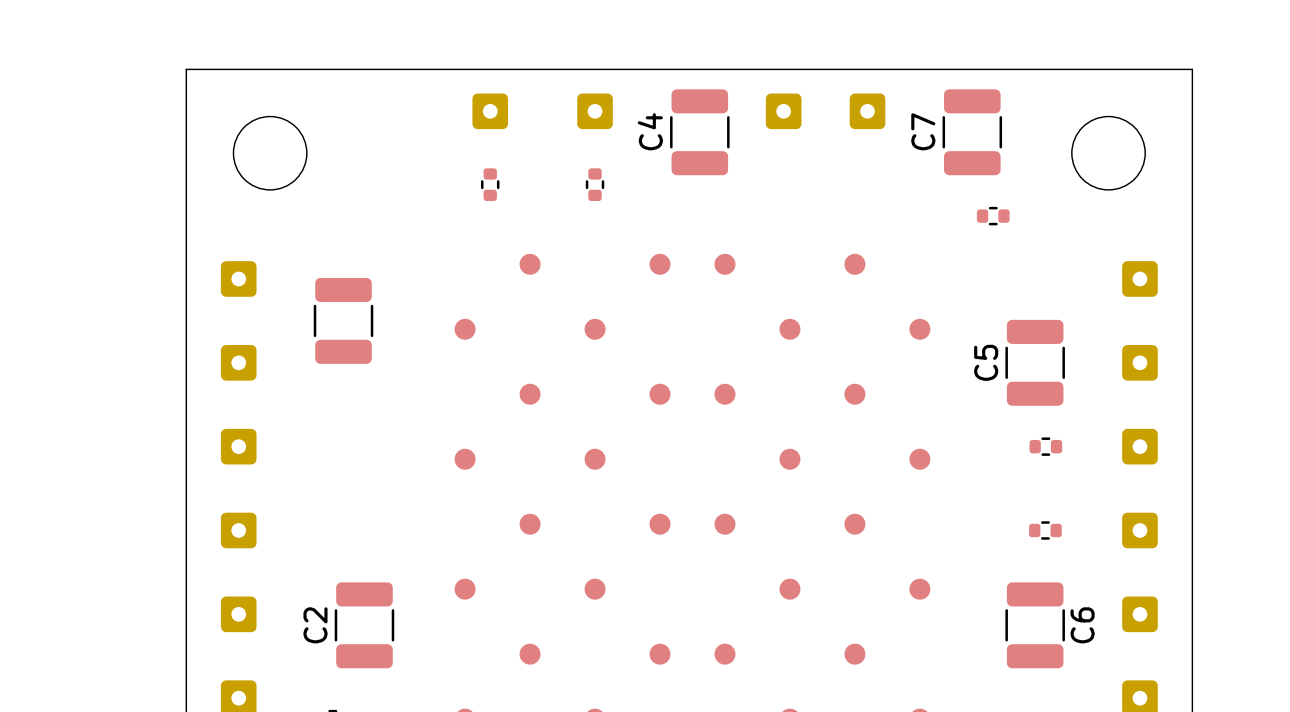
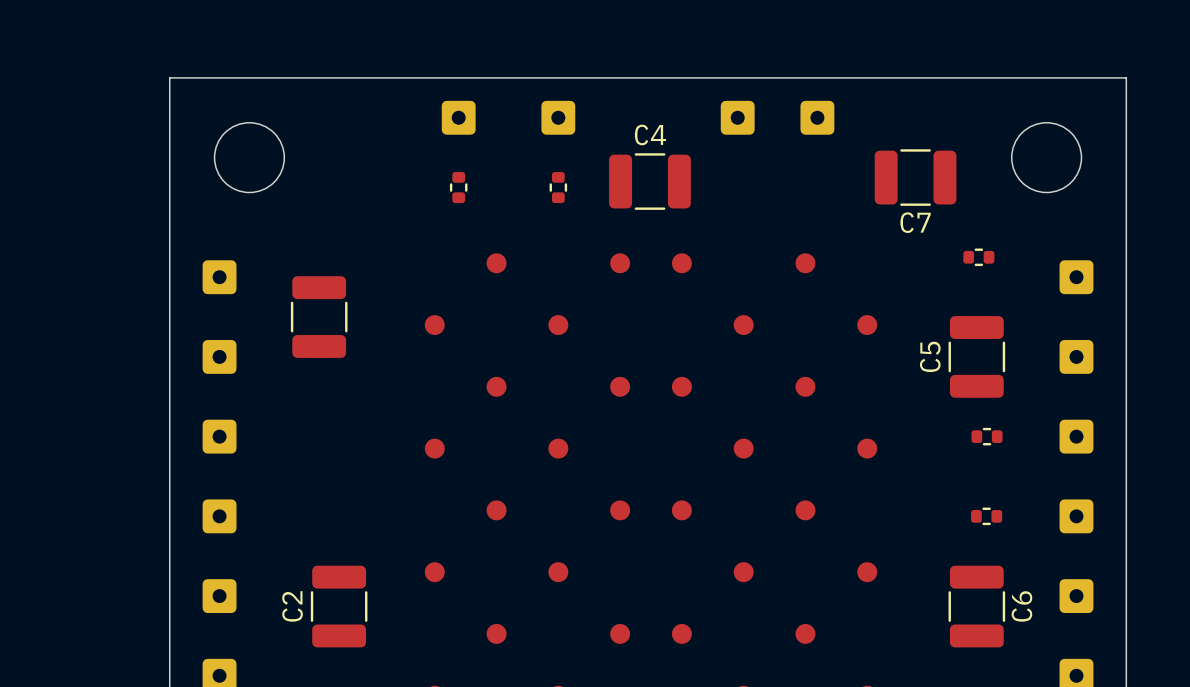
C7 name position: C7 (923, 131) -> C7 (915, 222)
C4 rotation: 0° (699, 132) -> 90° clockwise (650, 181)
C7 rotation: 0° (972, 132) -> 90° clockwise (915, 177)
part position: (993, 216) -> (978, 257)

